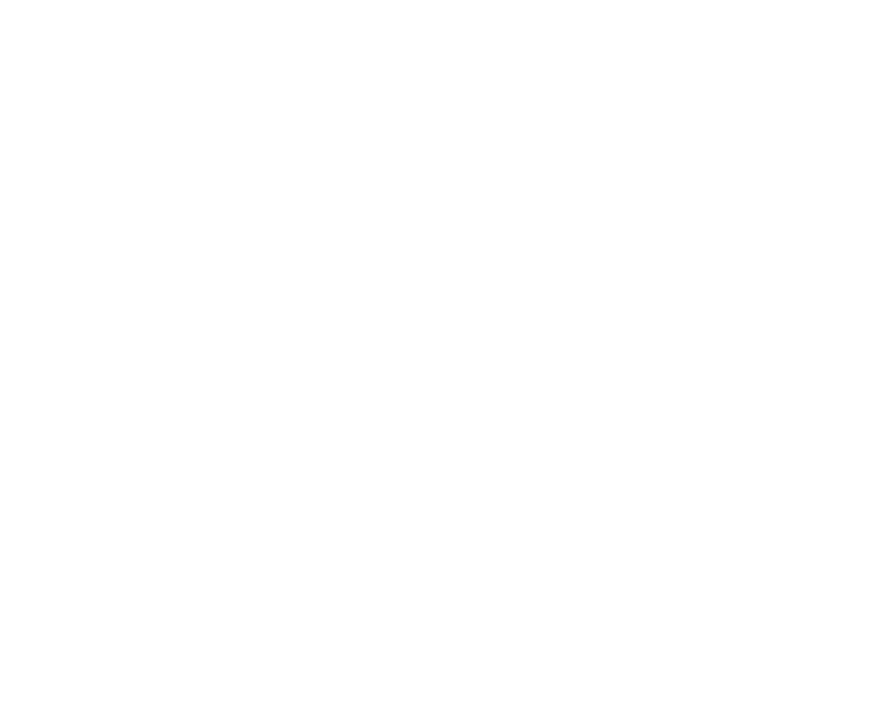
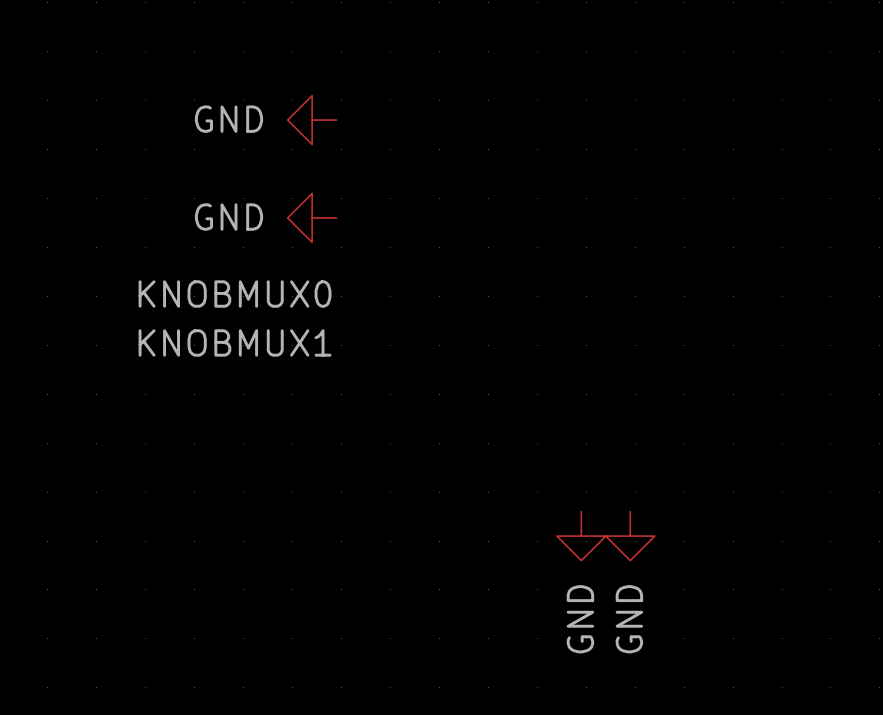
power symbol: none -> GND (312, 120)
power symbol: none -> GND (312, 217)
label: none -> KNOBMUX0 (235, 294)
label: none -> KNOBMUX1 (235, 342)
power symbol: none -> GND (581, 536)
power symbol: none -> GND (630, 536)

